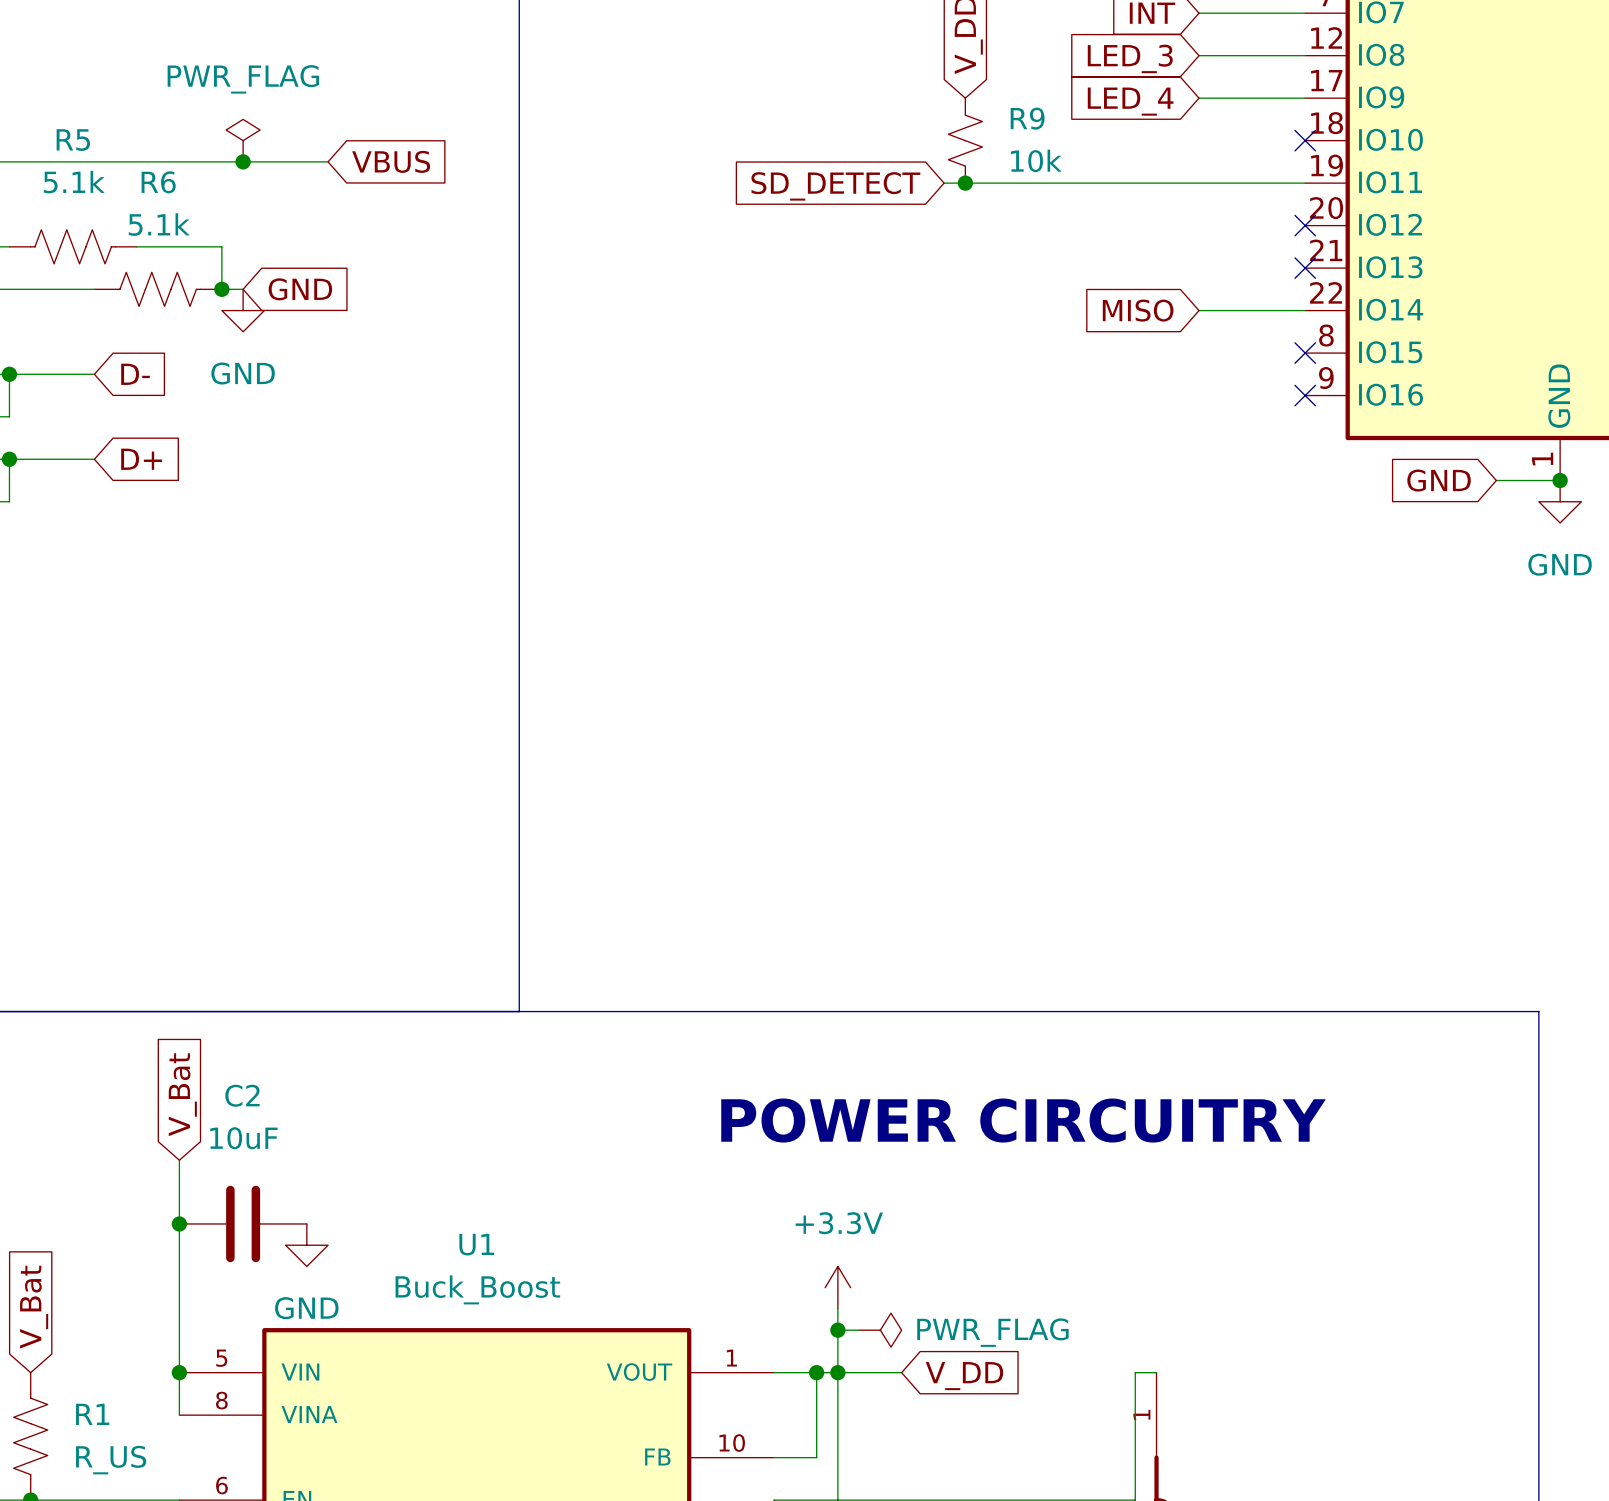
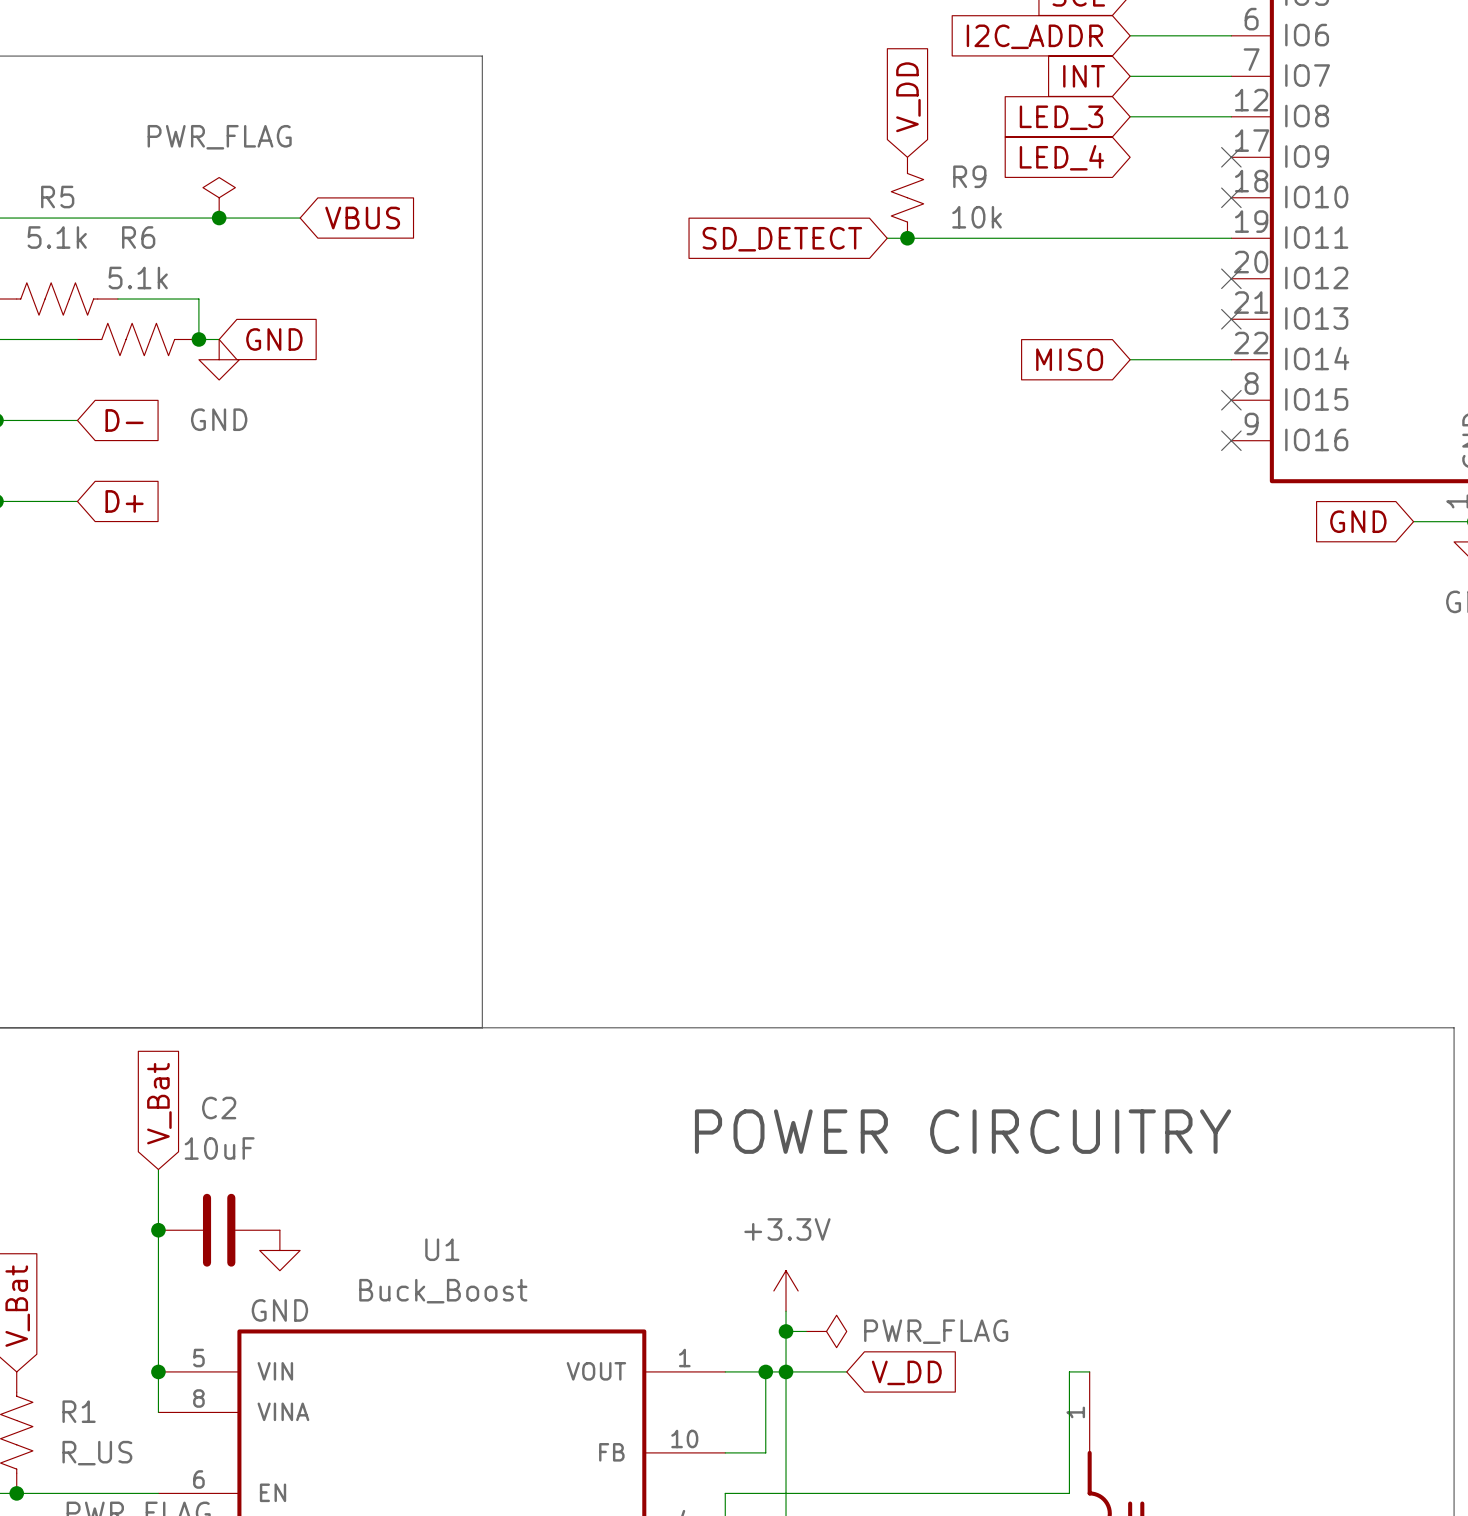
wire: (1199, 98) (1305, 98) -> none
no-connect mark: none -> (1231, 157)

